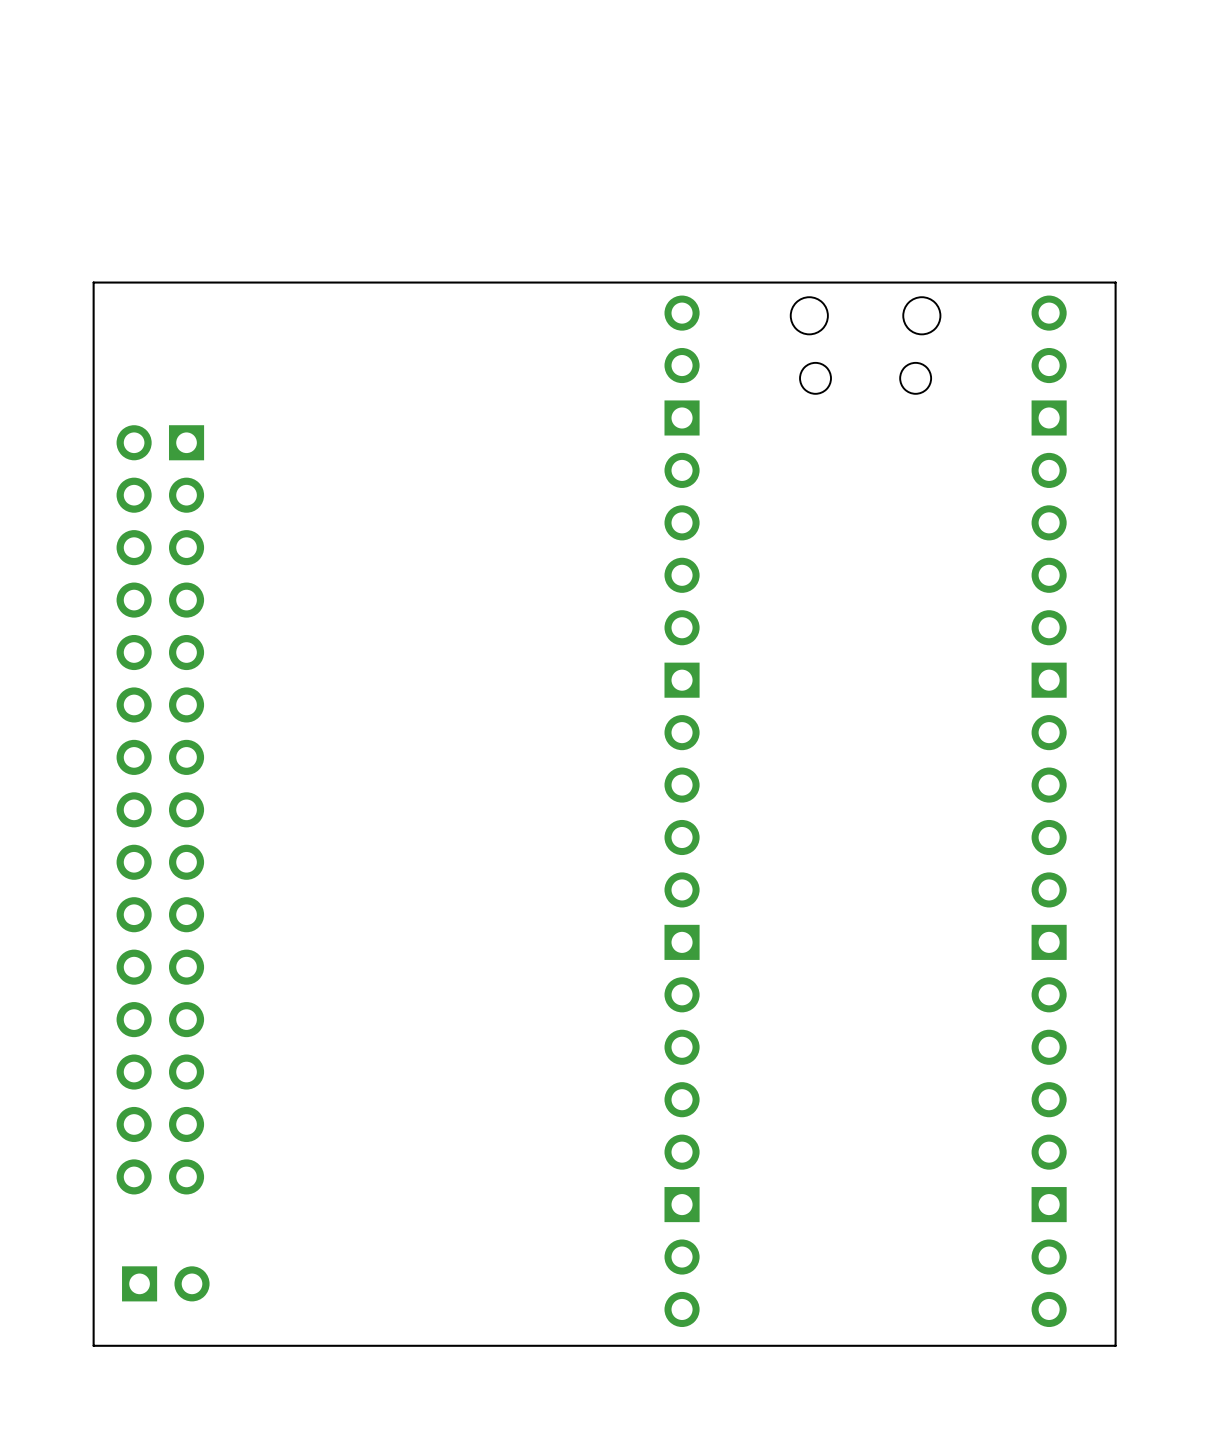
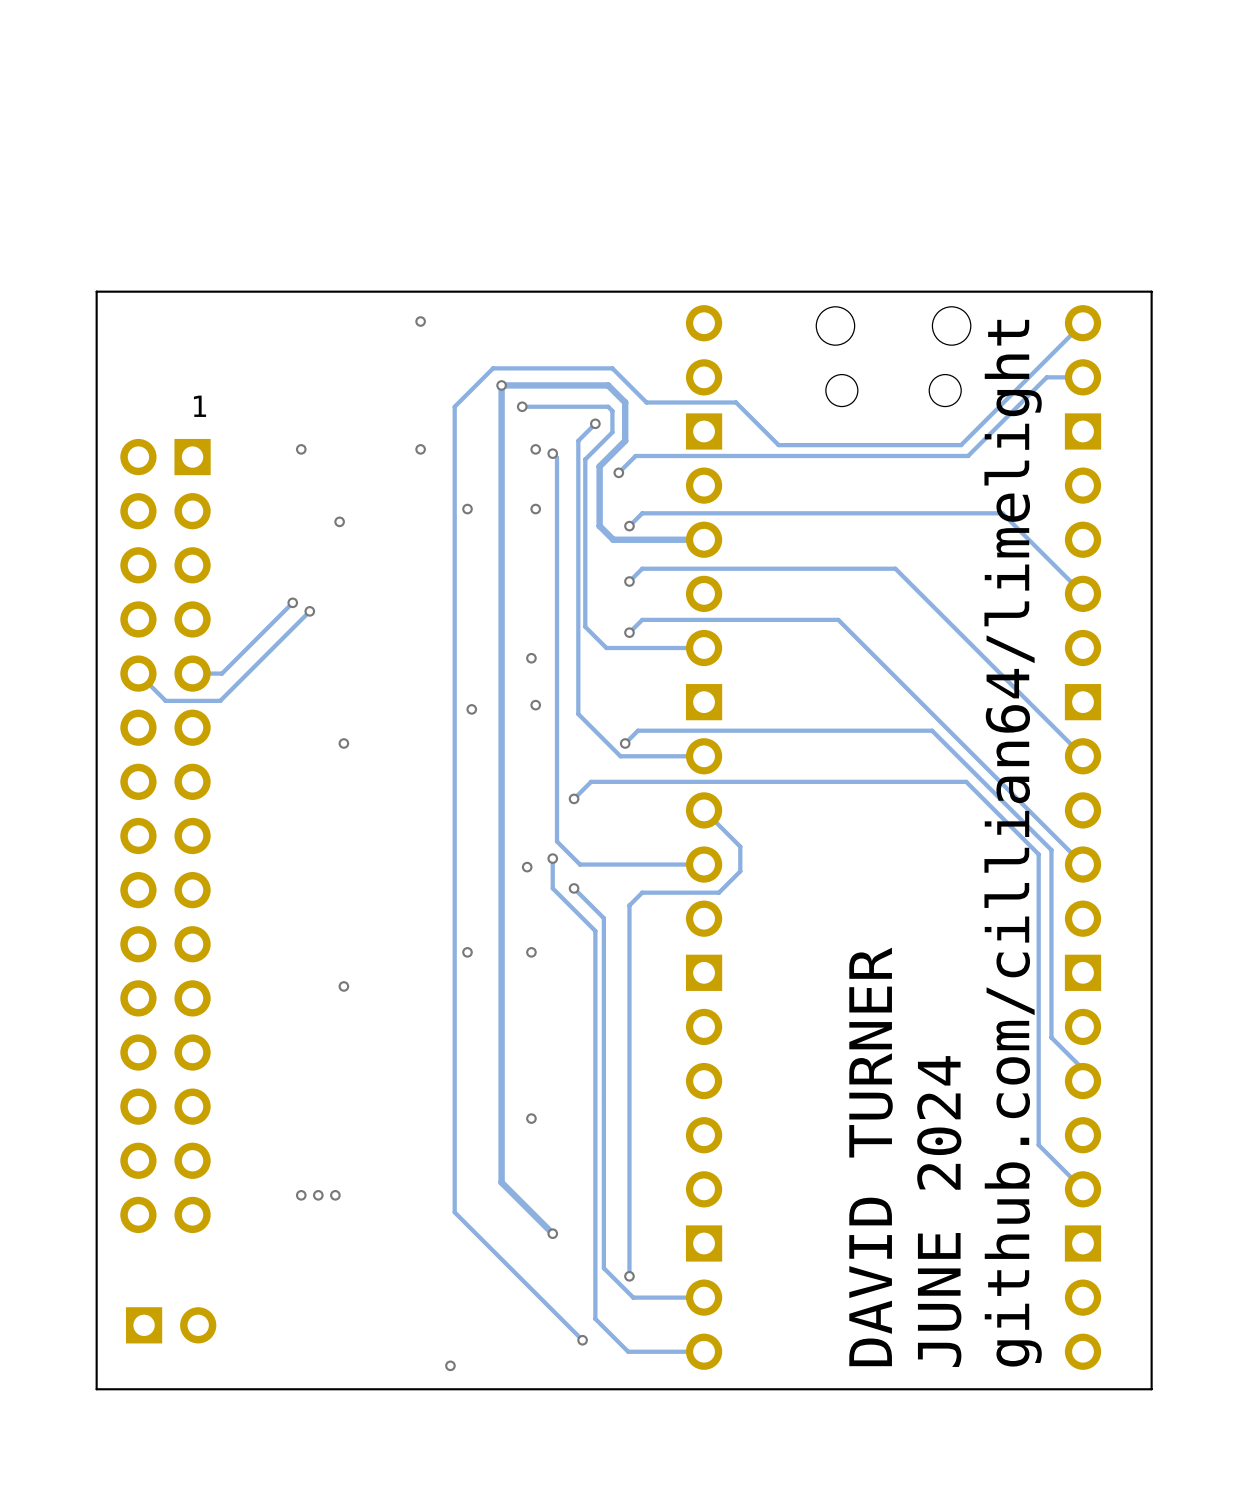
via: none -> (420, 321)
track: none -> (1083, 323) (961, 445) (778, 445) (736, 402) (646, 402) (612, 368) (493, 368) (454, 406) (454, 1212) (582, 1340)
track: none -> (1083, 377) (1046, 377) (968, 455) (635, 455) (618, 472)
via: none -> (501, 385)
text: none -> 1 (200, 406)
track: none -> (522, 406) (608, 406) (612, 411) (612, 432) (585, 459) (585, 626) (606, 648) (704, 648)
via: none -> (522, 406)
track: none -> (595, 423) (578, 440) (578, 714) (620, 756) (704, 756)
via: none -> (595, 423)
via: none -> (301, 449)
via: none -> (420, 449)
via: none -> (535, 449)
track: none -> (552, 453) (557, 457) (557, 841) (580, 864) (704, 864)
via: none -> (552, 453)
via: none -> (618, 472)
via: none -> (467, 509)
via: none -> (535, 509)
via: none -> (339, 521)
track: none -> (629, 526) (642, 513) (1002, 513) (1083, 593)
via: none -> (629, 526)
track: none -> (704, 539) (613, 539) (599, 526) (599, 466) (625, 440) (625, 402) (608, 385) (501, 385) (501, 1182) (552, 1233)
track: none -> (629, 581) (642, 568) (895, 568) (1083, 756)
via: none -> (629, 581)
track: none -> (292, 602) (221, 673) (192, 673)
via: none -> (292, 602)
track: none -> (309, 611) (220, 700) (165, 700) (138, 673)
via: none -> (309, 611)
track: none -> (629, 632) (642, 619) (838, 619) (1083, 864)
via: none -> (629, 632)
via: none -> (531, 658)
via: none -> (535, 705)
via: none -> (471, 709)
via: none -> (343, 743)
track: none -> (625, 743) (638, 730) (932, 730) (1051, 850) (1051, 1037) (1083, 1069) (1083, 1081)
via: none -> (625, 743)
track: none -> (574, 798) (591, 781) (966, 781) (1038, 854) (1038, 1145) (1083, 1189)
via: none -> (574, 798)
track: none -> (704, 810) (740, 846) (740, 871) (718, 892) (642, 892) (629, 905) (629, 1276)
track: none -> (552, 858) (552, 888) (595, 931) (595, 1318) (628, 1351) (704, 1351)
via: none -> (552, 858)
text: none -> github.com/cillian64/limelight (1013, 843)
via: none -> (527, 867)
track: none -> (574, 888) (603, 918) (603, 1268) (633, 1297) (704, 1297)
via: none -> (574, 888)
via: none -> (467, 952)
via: none -> (531, 952)
via: none -> (343, 986)
via: none -> (531, 1118)
text: none -> DAVID TURNER (871, 1156)
text: none -> JUNE 2024 (939, 1211)
via: none -> (301, 1195)
via: none -> (318, 1195)
via: none -> (335, 1195)
via: none -> (552, 1233)
via: none -> (629, 1276)
via: none -> (582, 1340)
via: none -> (450, 1365)

